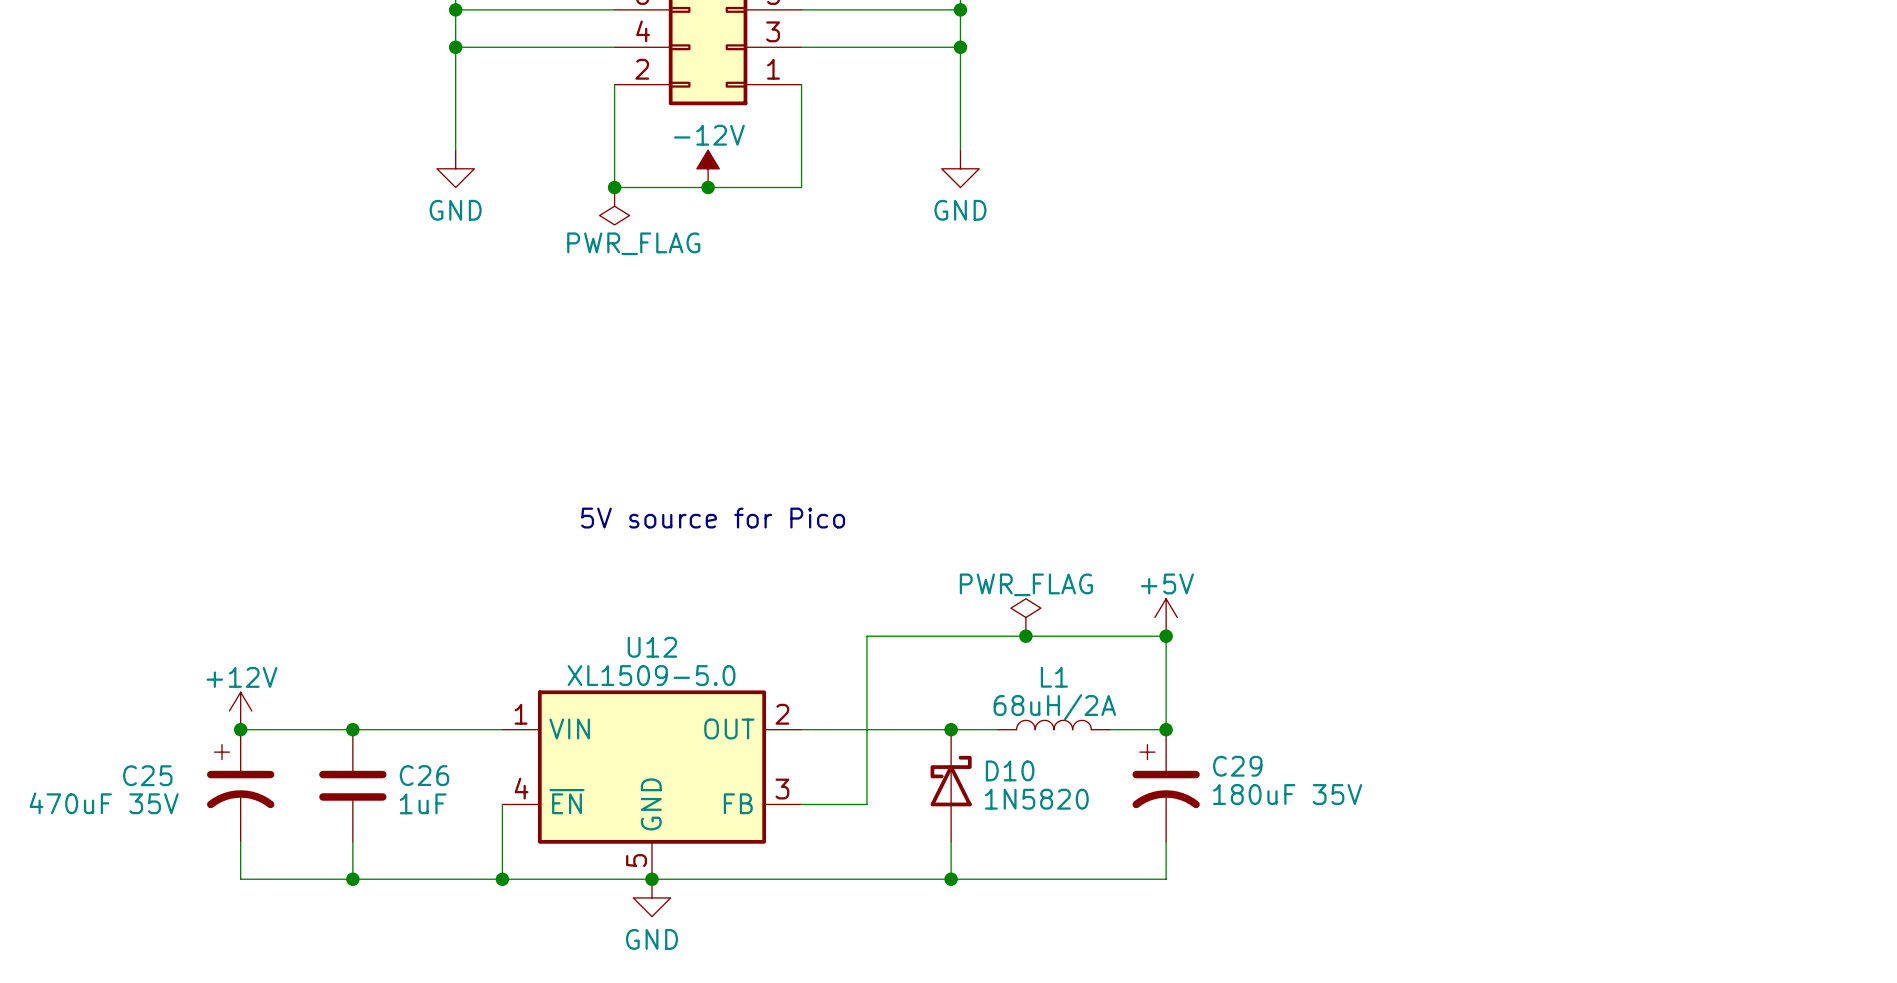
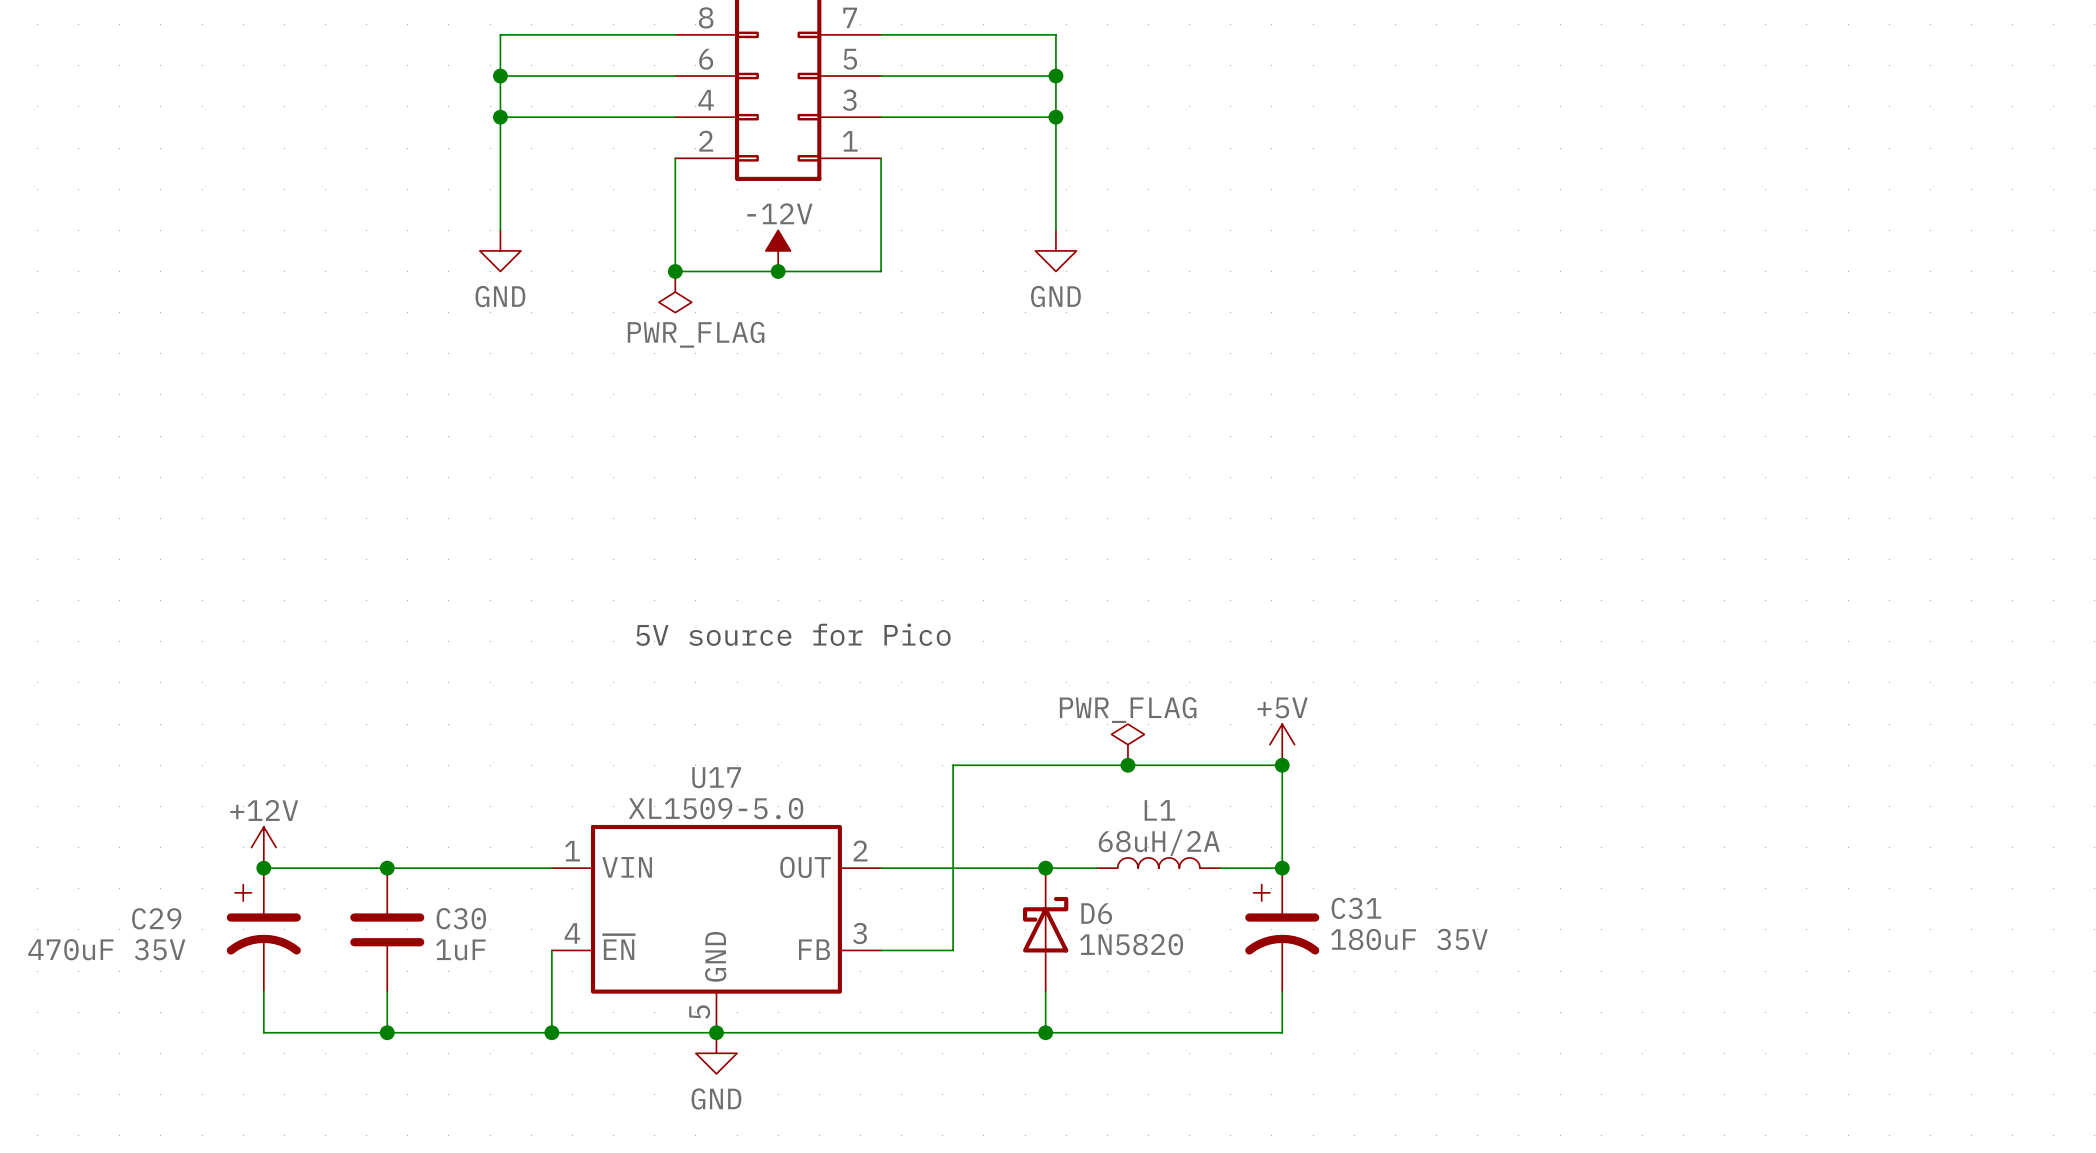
U12 name: U12 (652, 647) -> U17 (716, 777)
C29 name: C29 (1237, 766) -> C31 (1356, 908)
D10 name: D10 (1010, 770) -> D6 (1096, 913)
C25 name: C25 (147, 775) -> C29 (156, 918)
C26 name: C26 (424, 775) -> C30 (461, 918)

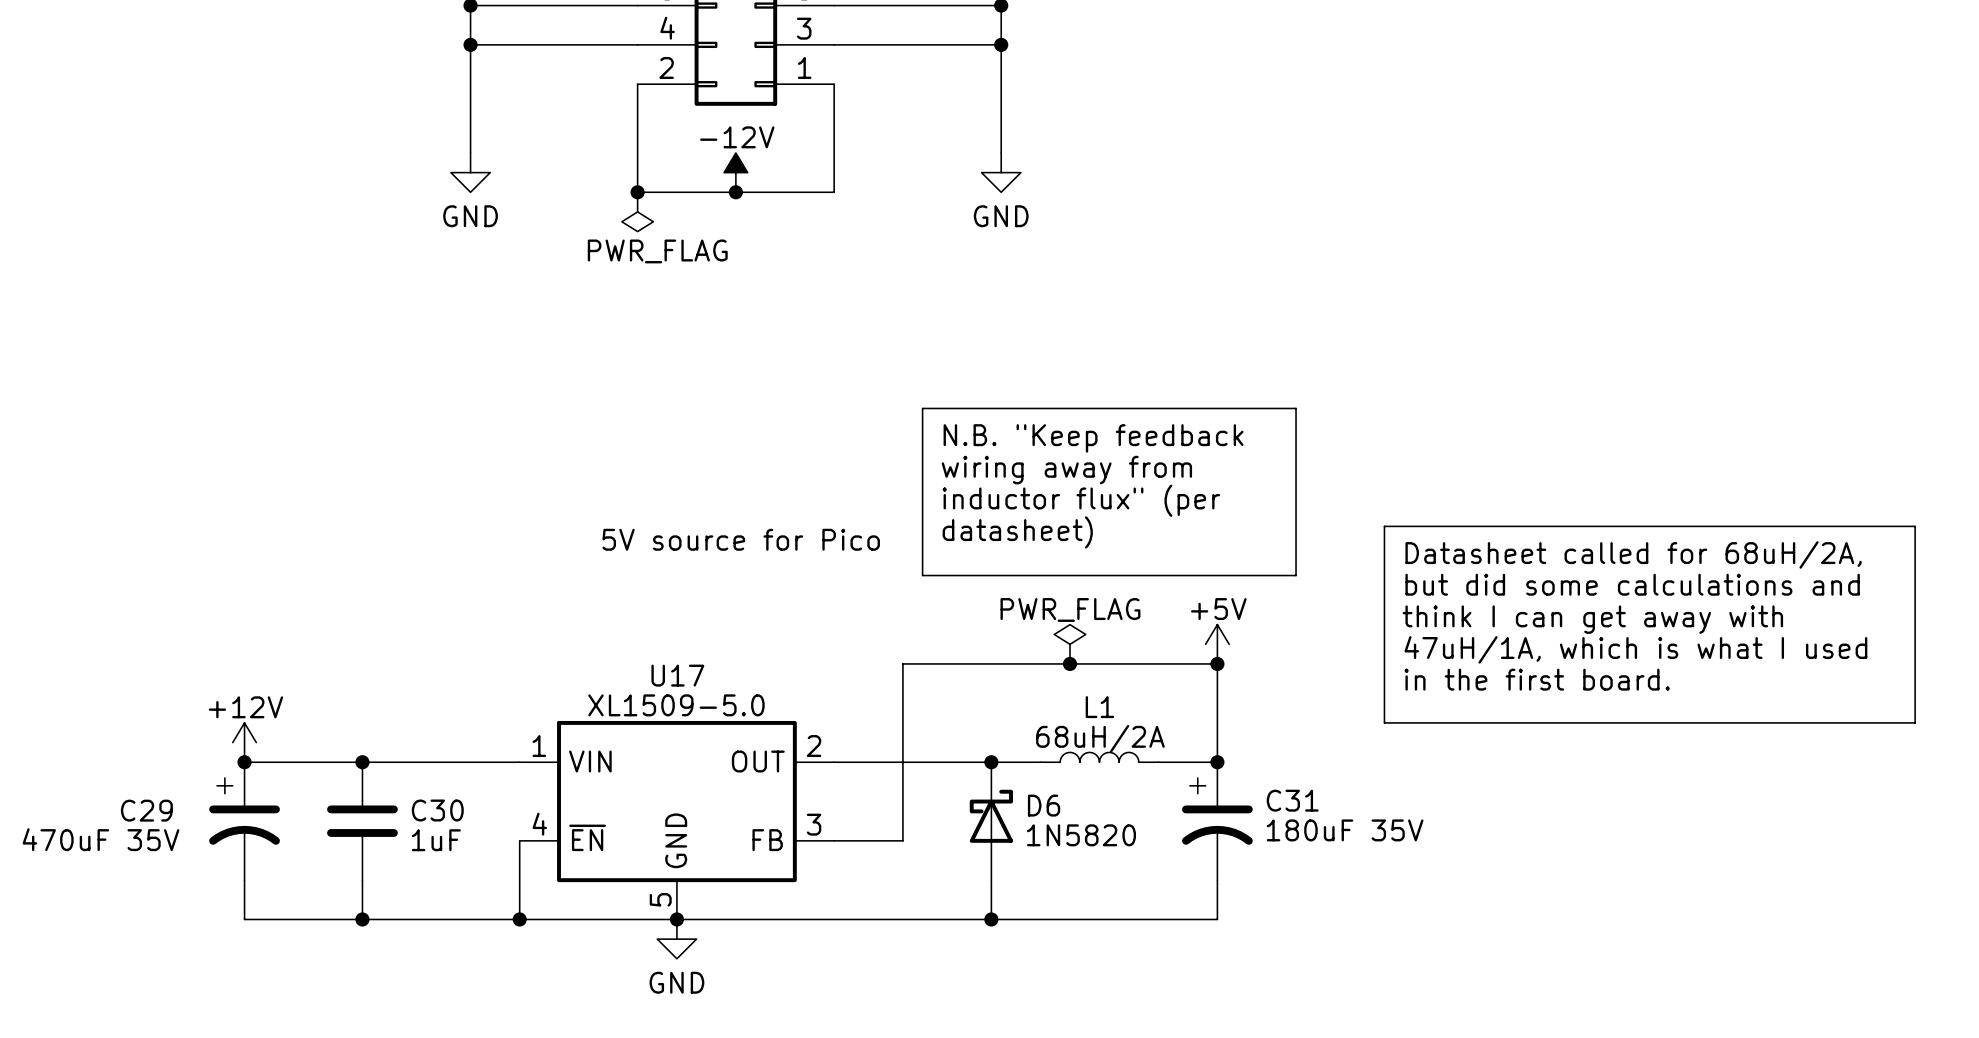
line: none -> (922, 408) (1296, 408) (1296, 575) (922, 575) (922, 408)
text: none -> N.B. "Keep feedback (1093, 438)
text: none -> wiring away from (1066, 470)
text: none -> inductor flux" (per (1081, 500)
line: none -> (1384, 526) (1915, 526) (1915, 722) (1384, 722) (1384, 526)
text: none -> datasheet) (1017, 532)
text: none -> Datasheet called for 68uH/2A, (1633, 554)
text: none -> but did some calculations and (1632, 584)
text: none -> think I can get away with (1592, 619)
text: none -> 47uH/1A, which is what I used (1635, 649)
text: none -> in the first board. (1537, 679)

